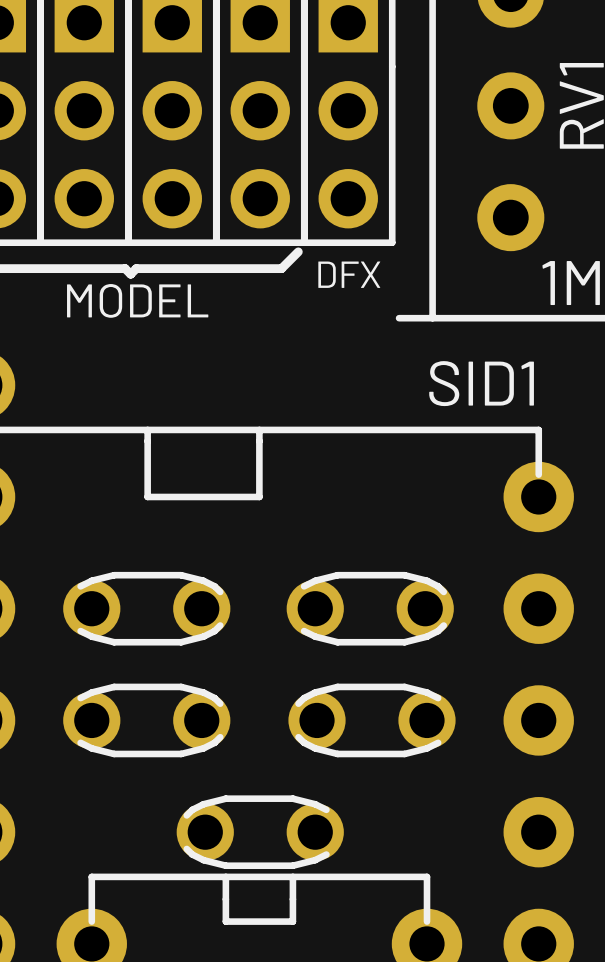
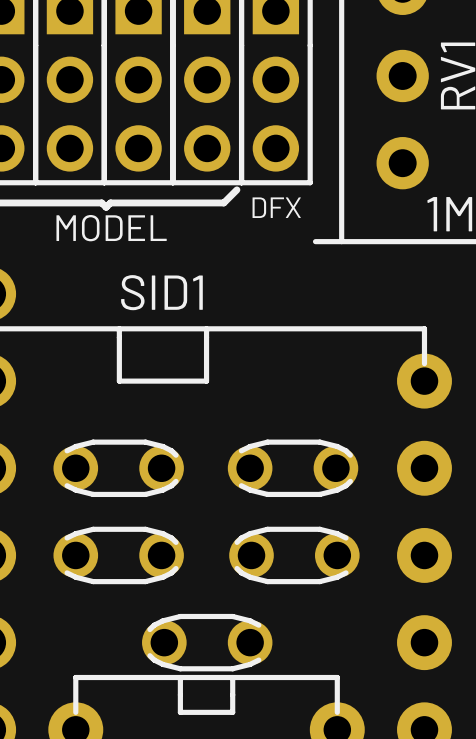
part value position: SID1 (481, 383) -> SID1 (161, 292)

